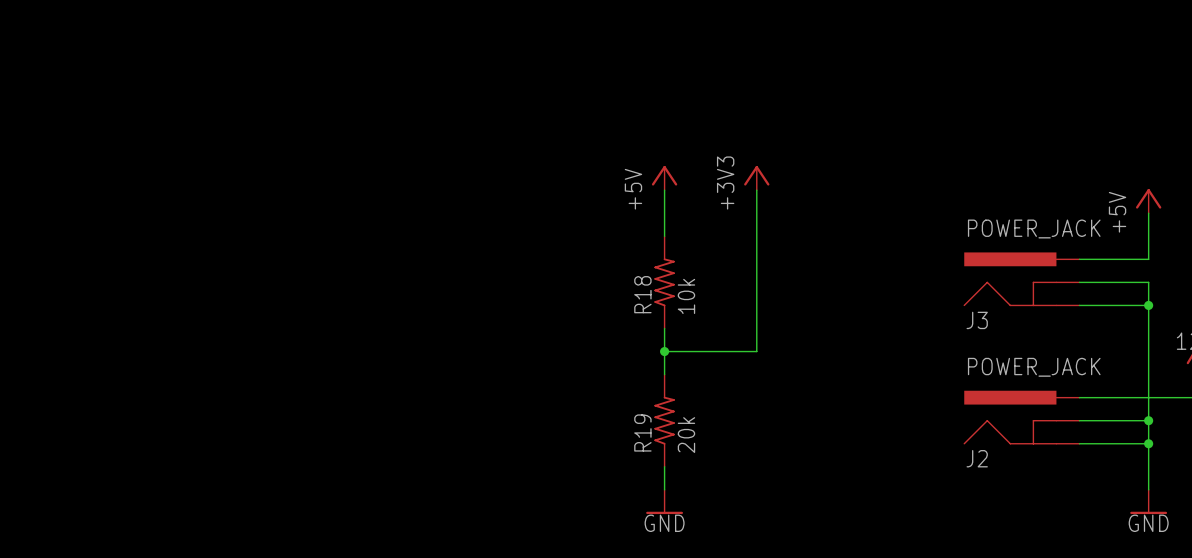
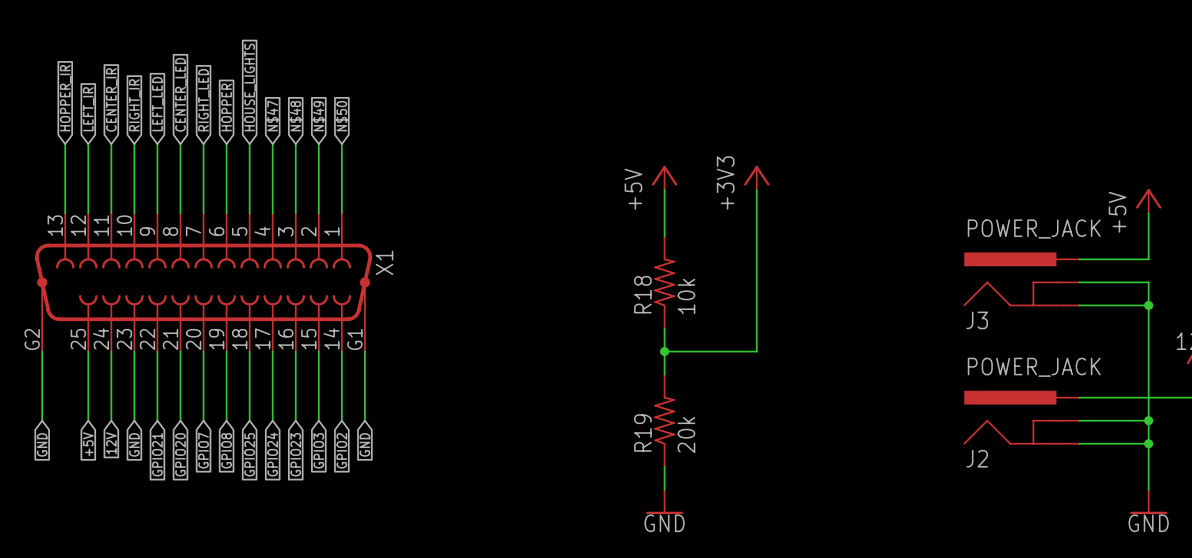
global label: none -> HOUSE_LIGHTS (250, 87)
global label: none -> CENTER_LED (180, 94)
global label: none -> HOPPER_IR (65, 98)
global label: none -> CENTER_IR (111, 99)
global label: none -> RIGHT_LED (203, 100)
global label: none -> LEFT_LED (157, 104)
global label: none -> RIGHT_IR (134, 105)
global label: none -> HOPPER (226, 107)
global label: none -> LEFT_IR (88, 109)
global label: none -> N$47 (272, 115)
global label: none -> N$48 (295, 116)
global label: none -> N$49 (318, 116)
global label: none -> N$50 (341, 116)
wire: none -> (65, 144) (65, 213)
wire: none -> (88, 144) (88, 213)
wire: none -> (111, 144) (111, 213)
wire: none -> (134, 144) (134, 213)
wire: none -> (157, 144) (157, 213)
wire: none -> (180, 144) (180, 213)
wire: none -> (203, 144) (203, 213)
wire: none -> (226, 144) (226, 213)
wire: none -> (249, 144) (249, 213)
wire: none -> (272, 144) (272, 213)
wire: none -> (295, 144) (295, 213)
wire: none -> (318, 144) (318, 213)
wire: none -> (341, 144) (341, 213)
X1: none -> (203, 282)
wire: none -> (42, 351) (42, 420)
wire: none -> (88, 351) (88, 420)
wire: none -> (111, 351) (111, 420)
wire: none -> (134, 351) (134, 420)
wire: none -> (157, 351) (157, 420)
wire: none -> (180, 351) (180, 420)
wire: none -> (203, 351) (203, 420)
wire: none -> (226, 351) (226, 420)
wire: none -> (249, 351) (249, 420)
wire: none -> (272, 351) (272, 420)
wire: none -> (295, 351) (295, 420)
wire: none -> (318, 351) (318, 420)
wire: none -> (341, 351) (341, 420)
wire: none -> (364, 351) (364, 420)
global label: none -> 12V (111, 443)
global label: none -> GND (42, 444)
global label: none -> +5V (88, 444)
global label: none -> GND (134, 444)
global label: none -> GND (364, 444)
global label: none -> GPIO7 (203, 450)
global label: none -> GPIO8 (226, 450)
global label: none -> GPIO3 (318, 450)
global label: none -> GPIO2 (341, 450)
global label: none -> GPIO21 (157, 454)
global label: none -> GPIO20 (180, 454)
global label: none -> GPIO25 (249, 454)
global label: none -> GPIO24 (272, 454)
global label: none -> GPIO23 (295, 454)

